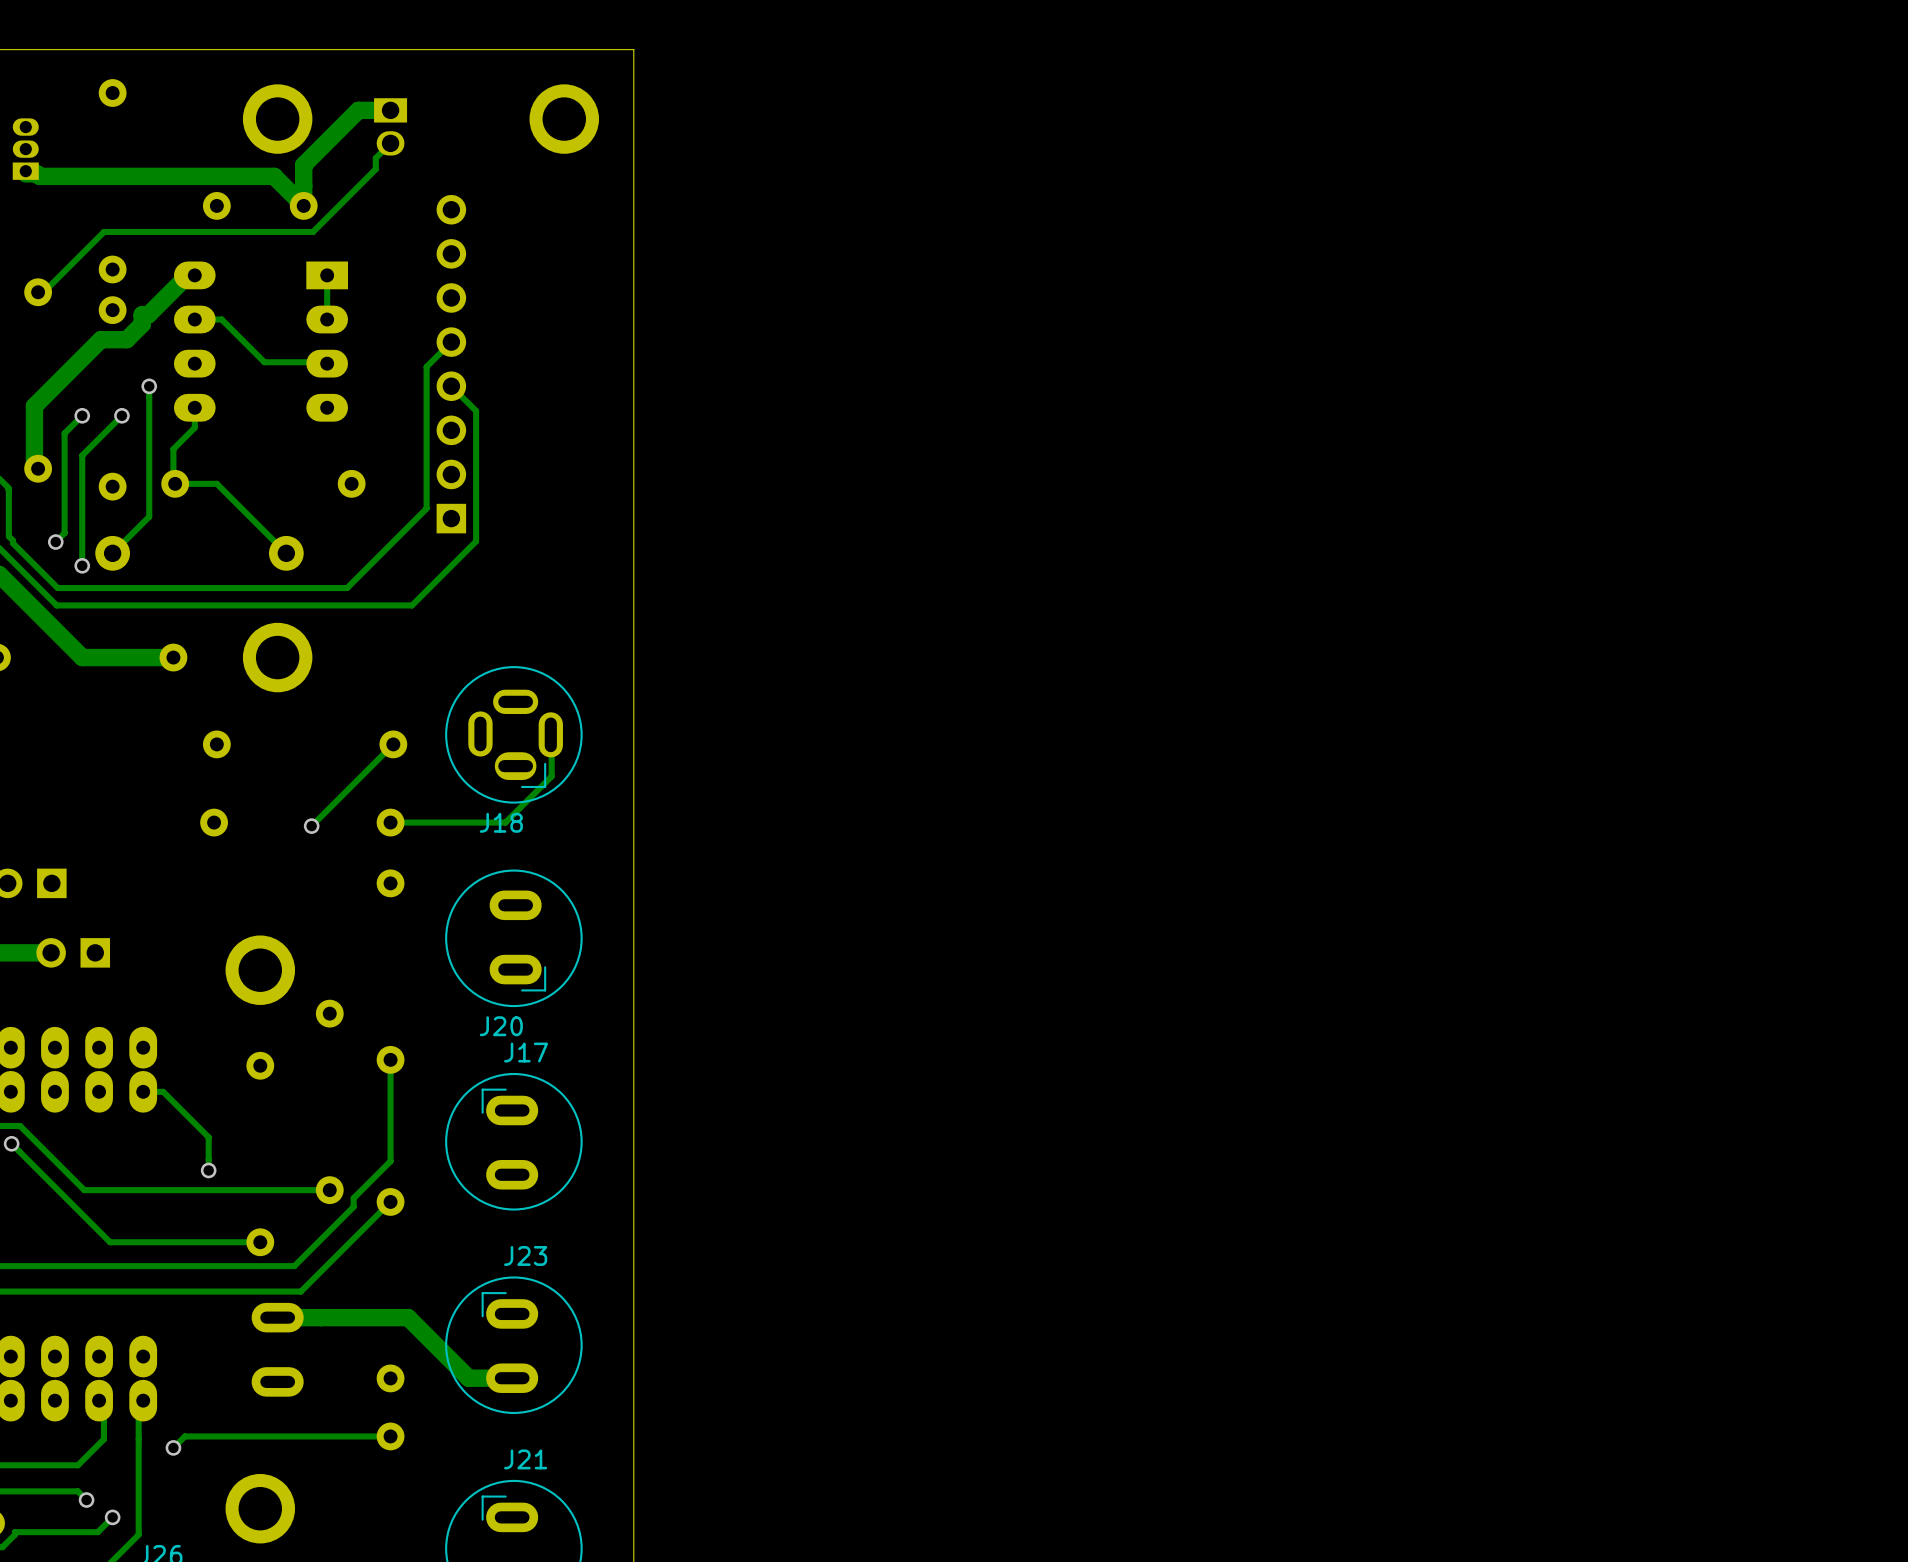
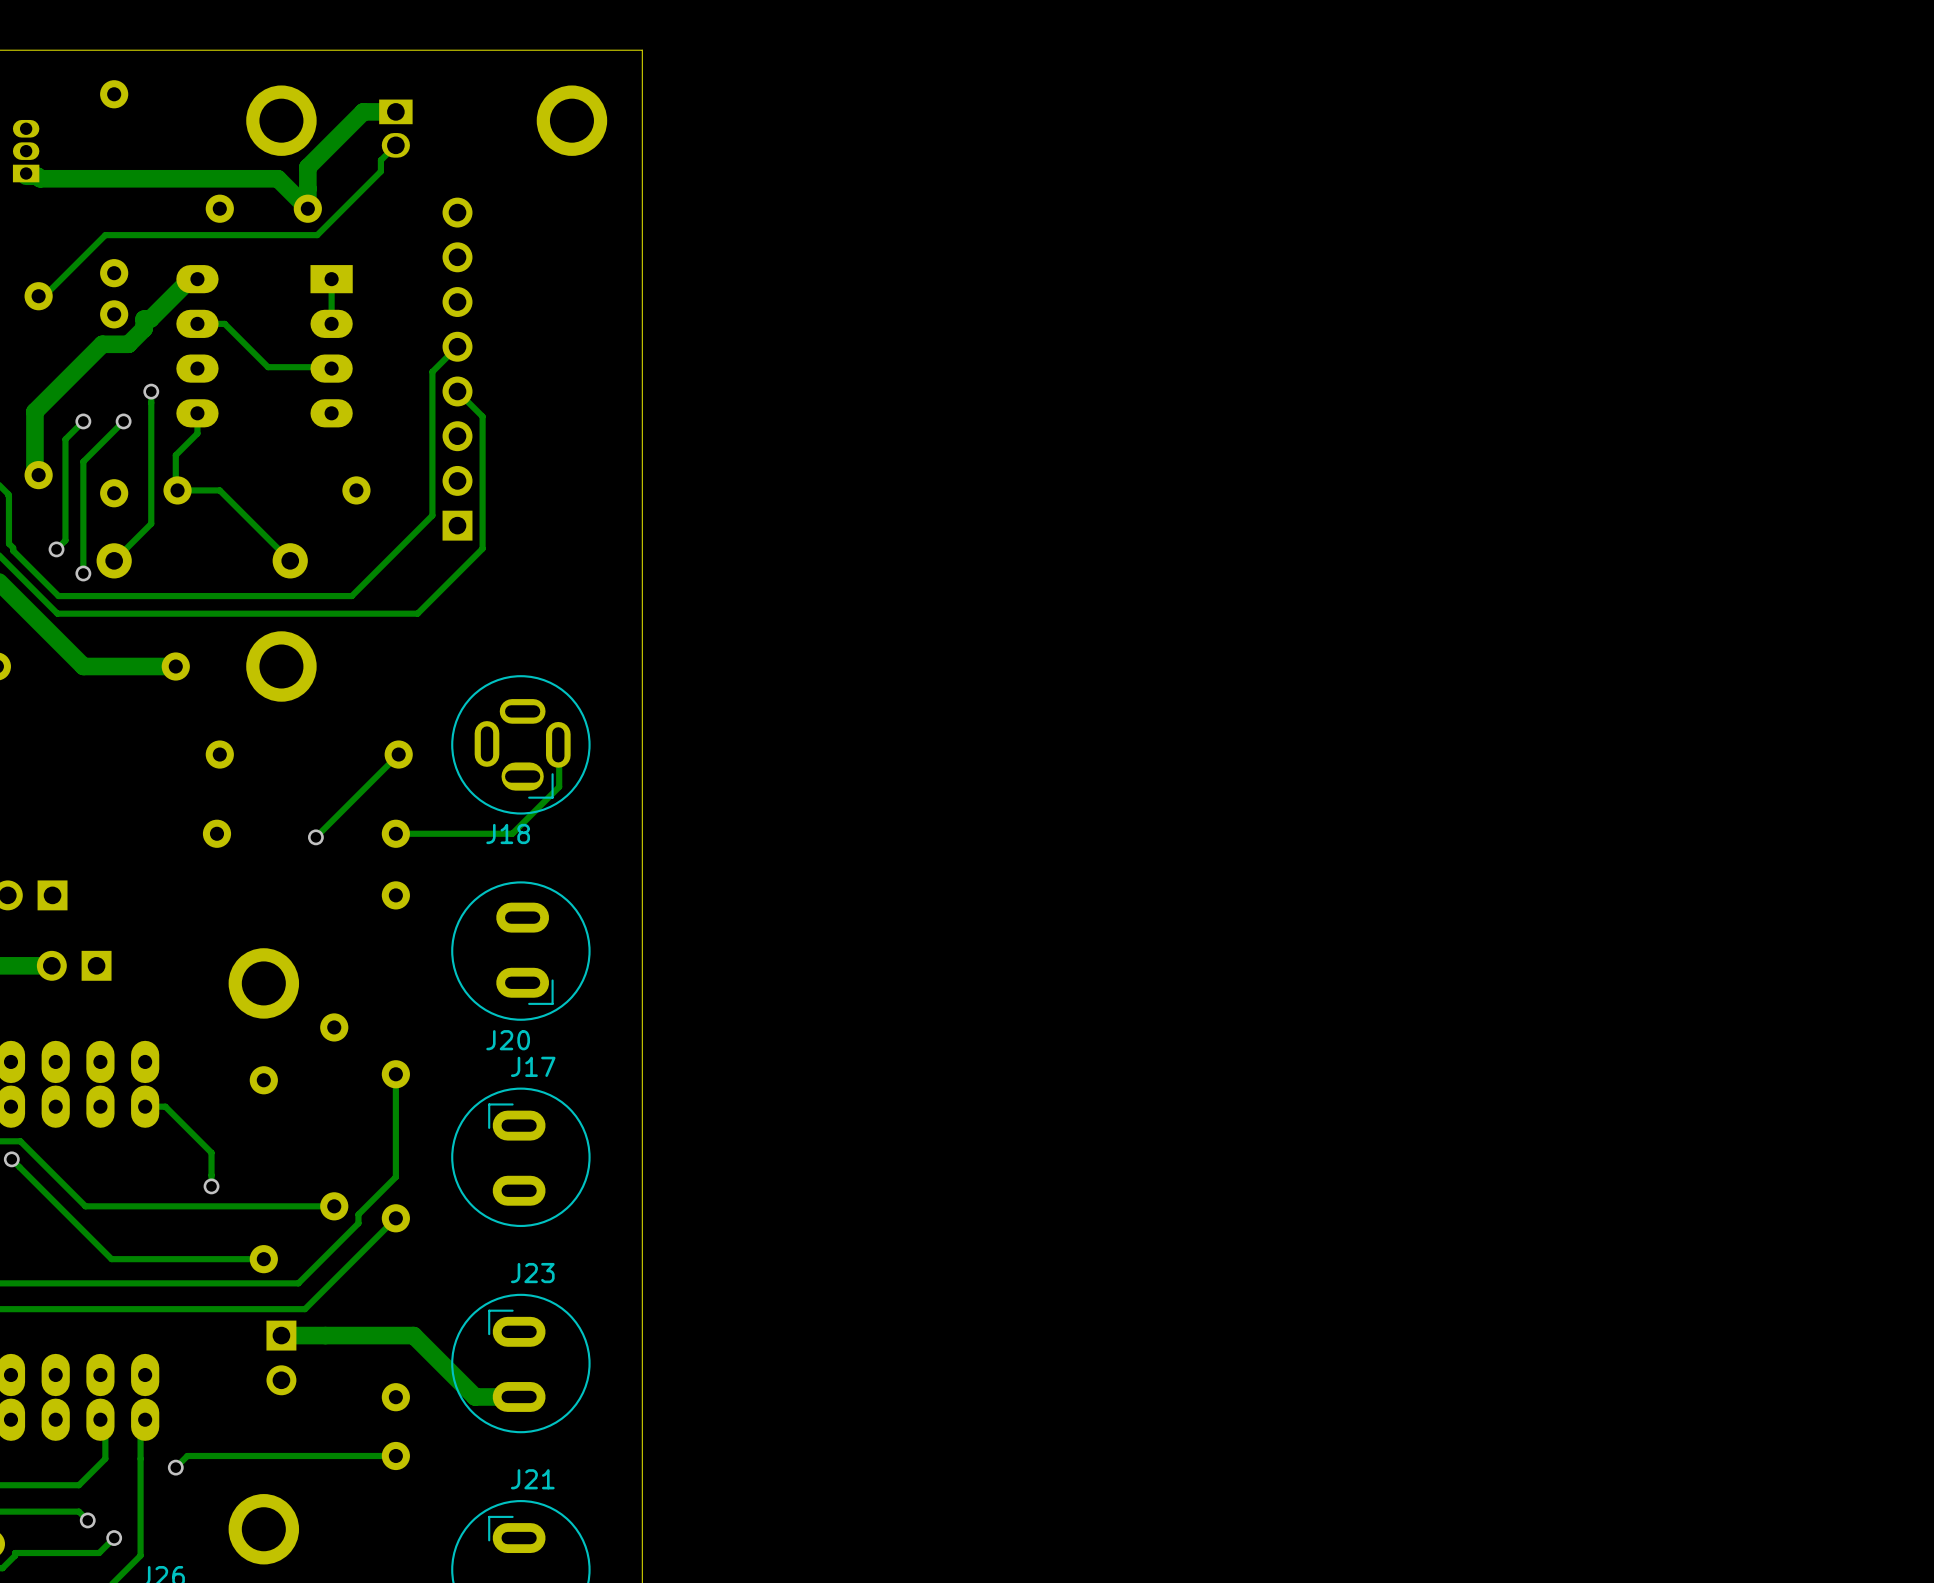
part footprint: [251, 1302, 304, 1397] -> [266, 1320, 297, 1396]

